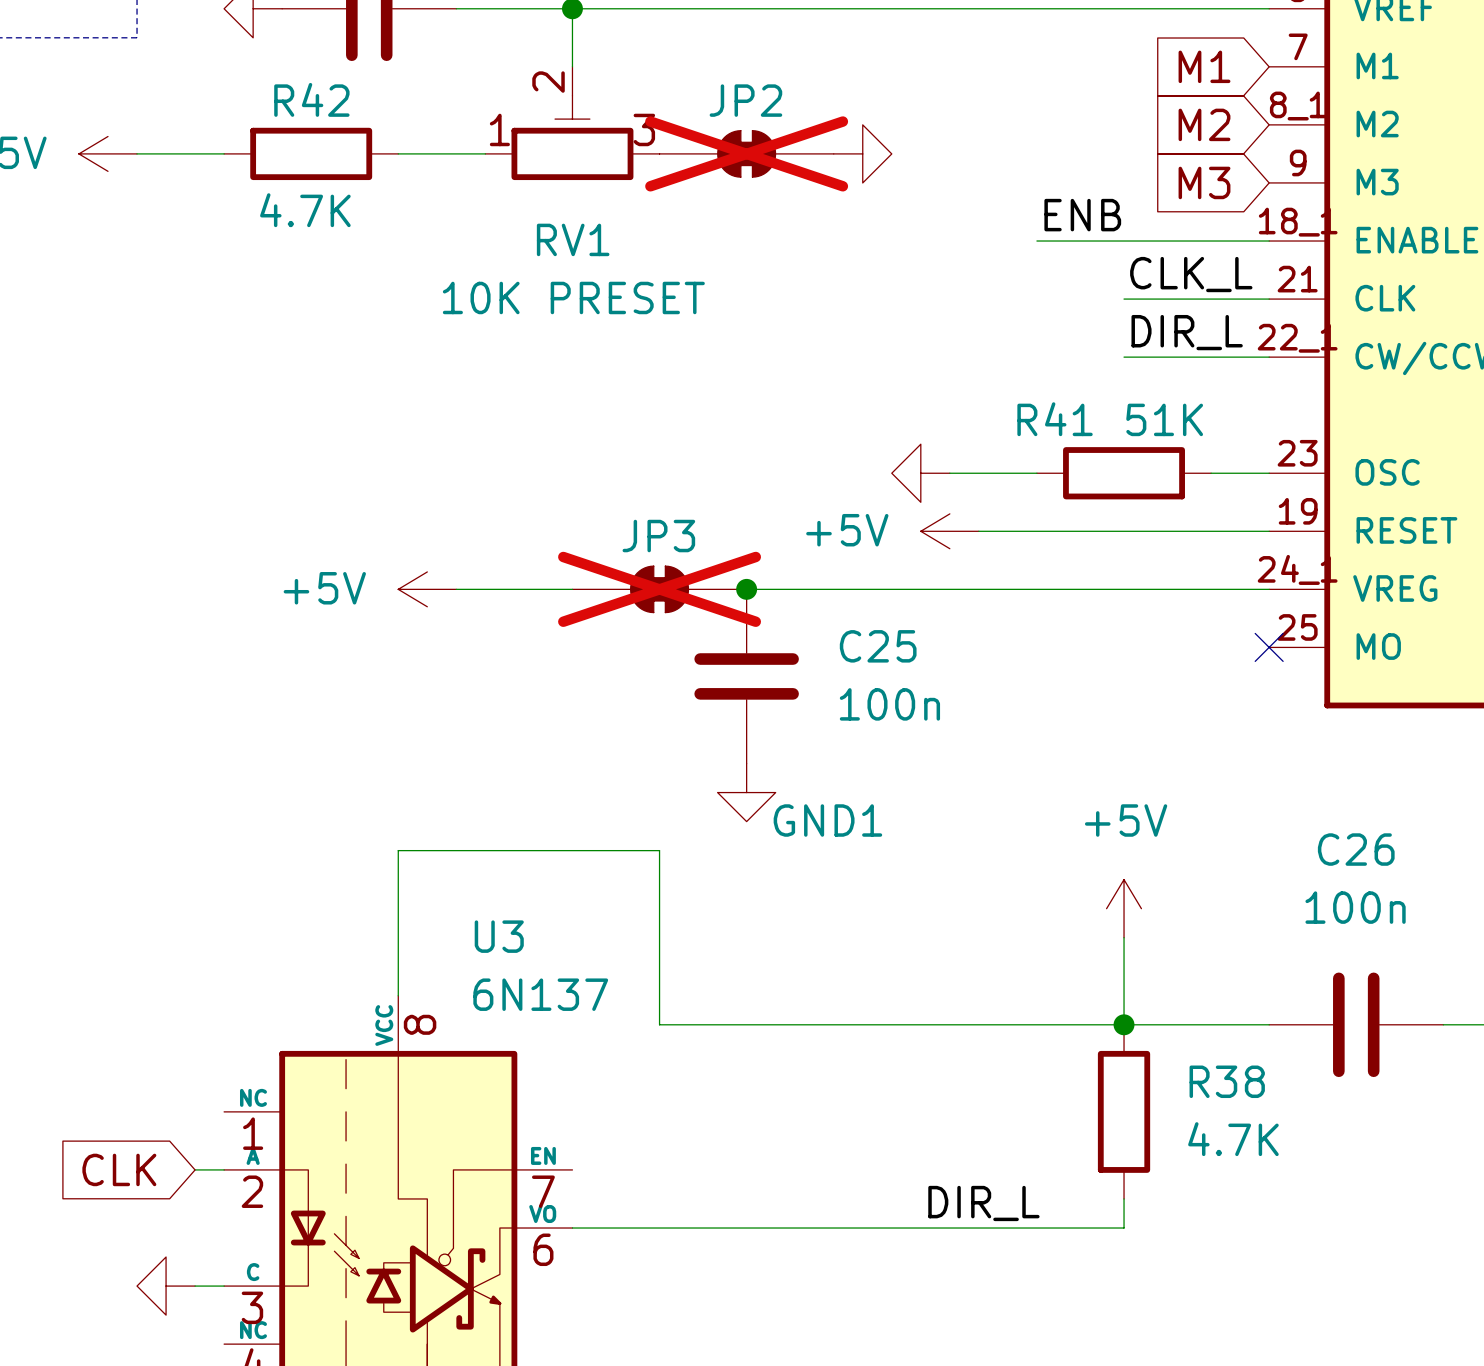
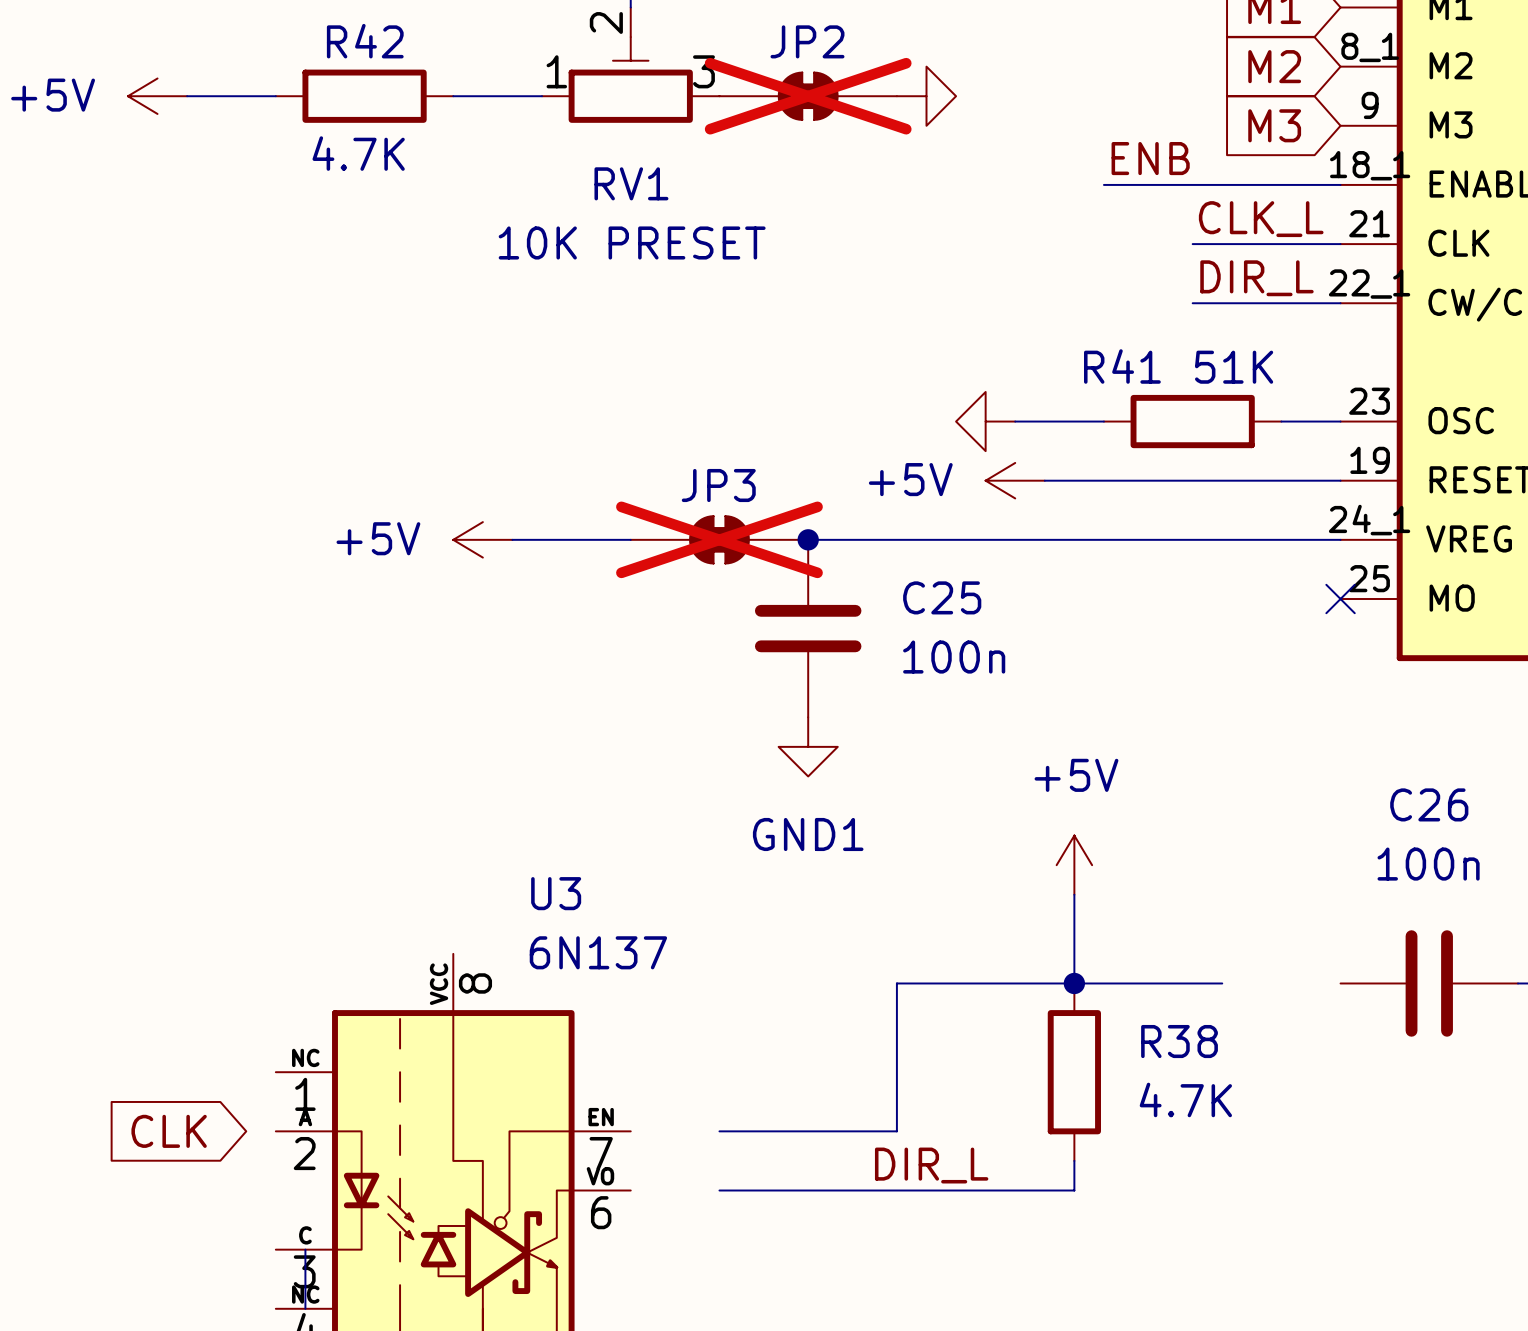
power symbol text position: GND1 (827, 820) -> GND1 (808, 834)
power symbol position: +5V (1124, 908) -> +5V (1074, 865)
wire: (1124, 937) (1124, 1024) -> (1074, 894) (1074, 983)
wire: (398, 995) (398, 850) (659, 850) (659, 1024) (833, 1024) -> (719, 1131) (896, 1131) (896, 983)
junction position: (1124, 1024) -> (1074, 983)
wire: (1153, 1024) (1269, 1024) -> none
R38 position: (1124, 1111) -> (1074, 1072)
wire: (195, 1169) (224, 1169) -> none
wire: (1124, 1198) (1124, 1228) (1007, 1228) -> (1074, 1160) (1074, 1190)
label position: DIR_L (983, 1203) -> DIR_L (931, 1165)
wire: (572, 1228) (659, 1228) -> none
power symbol: (166, 1286) -> none
wire: (195, 1286) (224, 1286) -> none
wire: none -> (305, 1249) (305, 1308)

